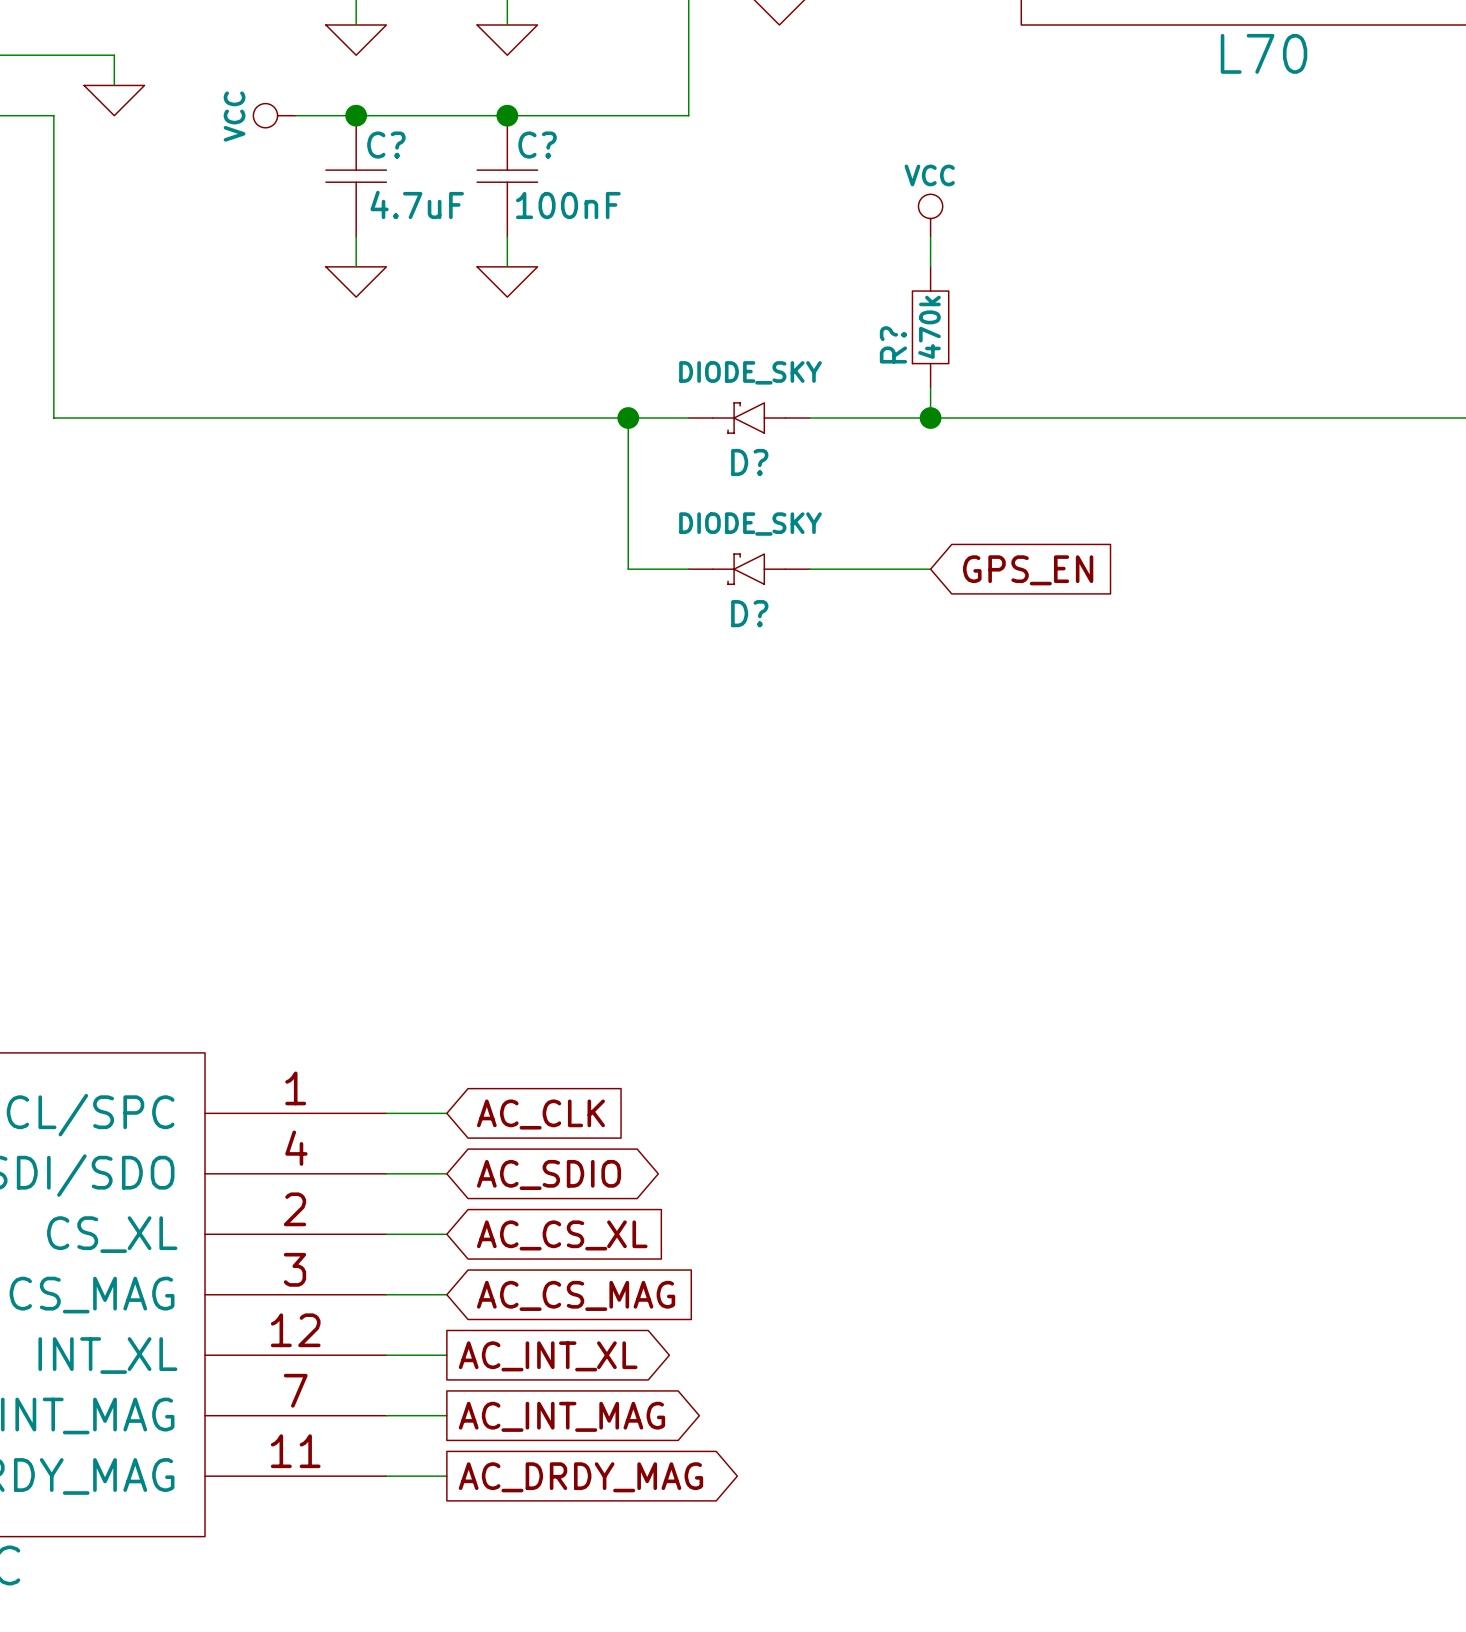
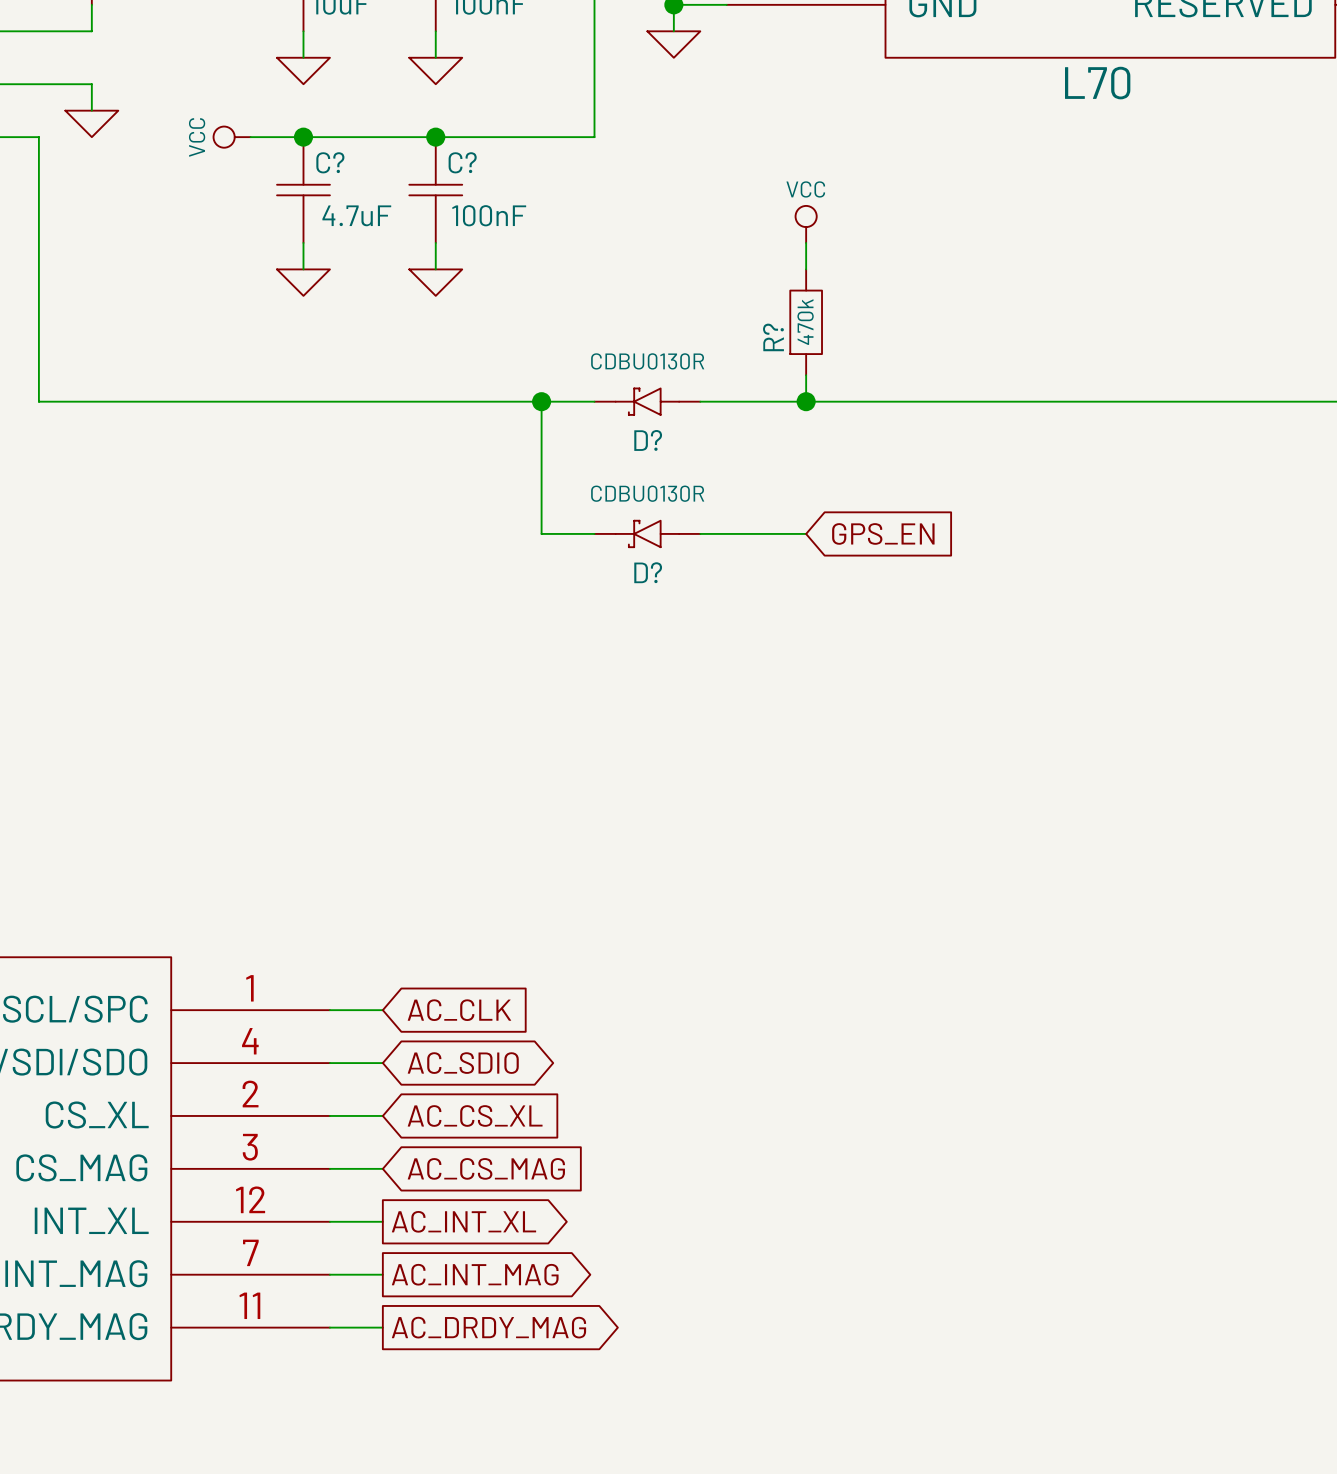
D? value: DIODE_SKY (750, 372) -> CDBU0130R (647, 361)
D? value: DIODE_SKY (750, 524) -> CDBU0130R (647, 493)

